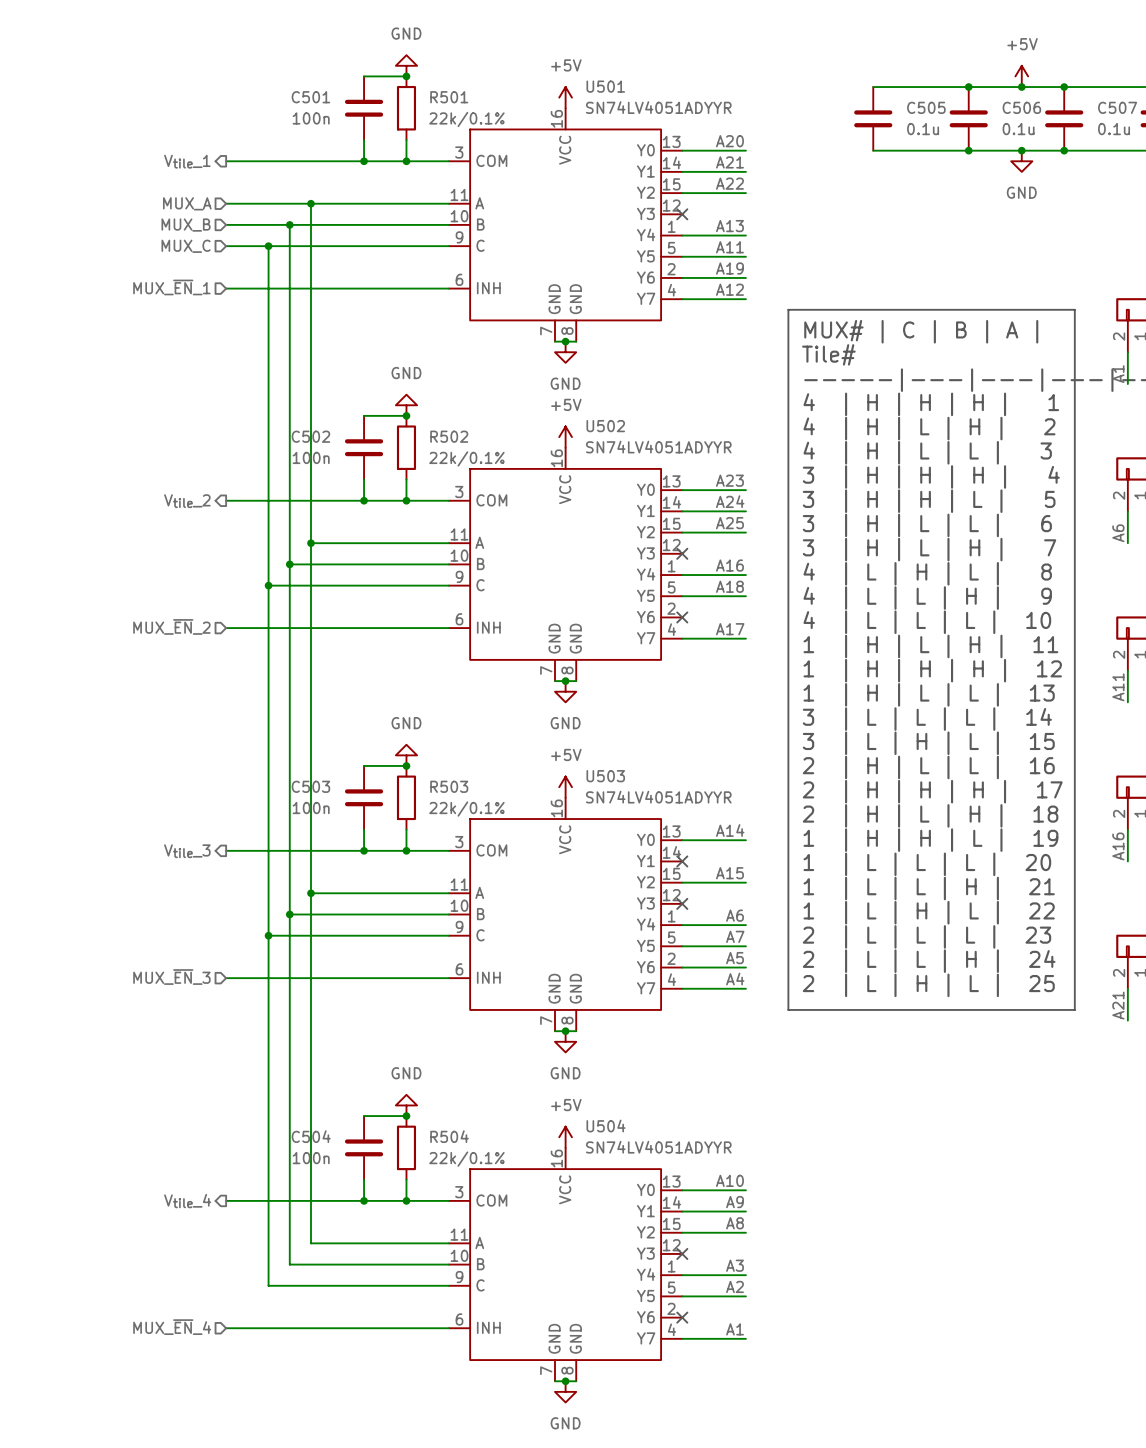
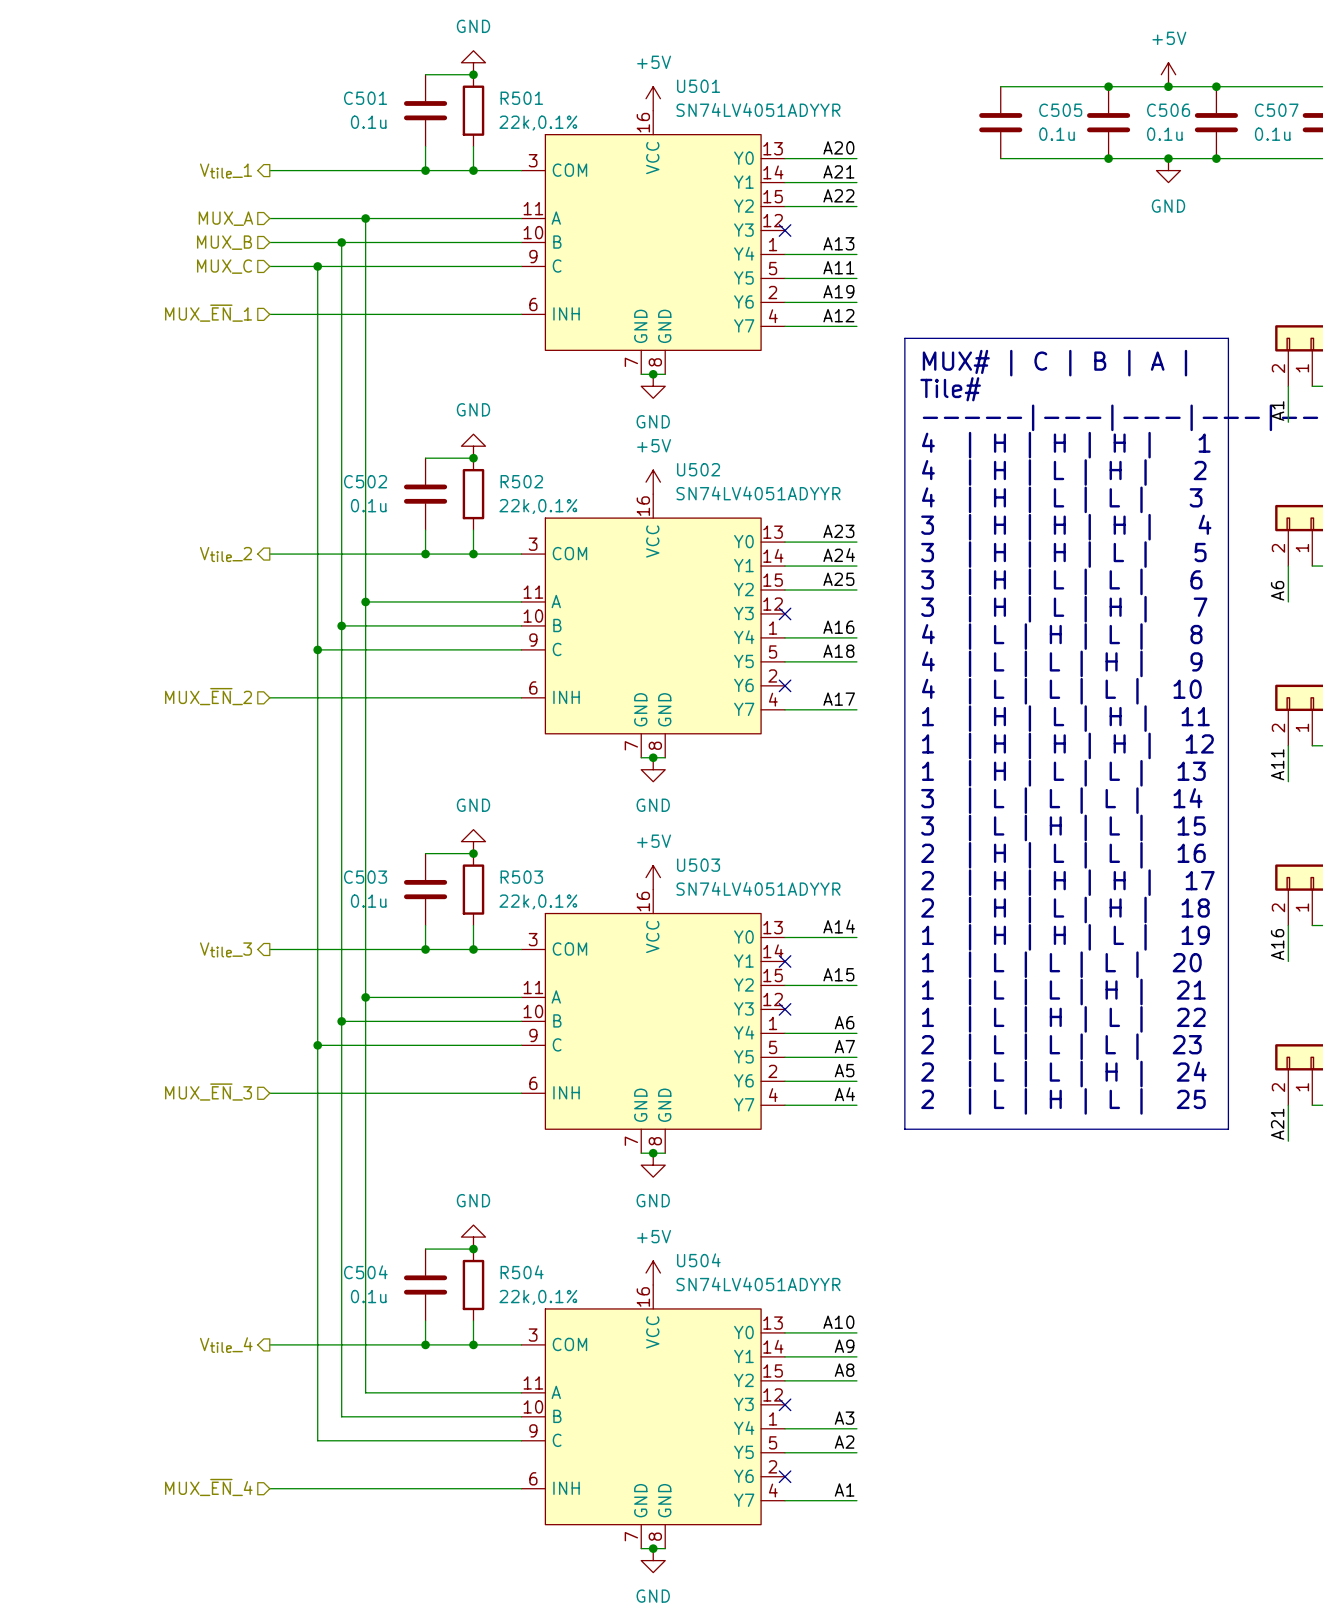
C501 value: 100n (311, 118) -> 0.1u (368, 122)
R501 value: 22k/0.1% (466, 119) -> 22k,0.1% (538, 123)
C502 value: 100n (311, 457) -> 0.1u (368, 505)
R502 value: 22k/0.1% (466, 458) -> 22k,0.1% (538, 506)
C503 value: 100n (311, 808) -> 0.1u (368, 901)
R503 value: 22k/0.1% (466, 809) -> 22k,0.1% (538, 901)
C504 value: 100n (311, 1158) -> 0.1u (368, 1296)
R504 value: 22k/0.1% (466, 1159) -> 22k,0.1% (538, 1297)

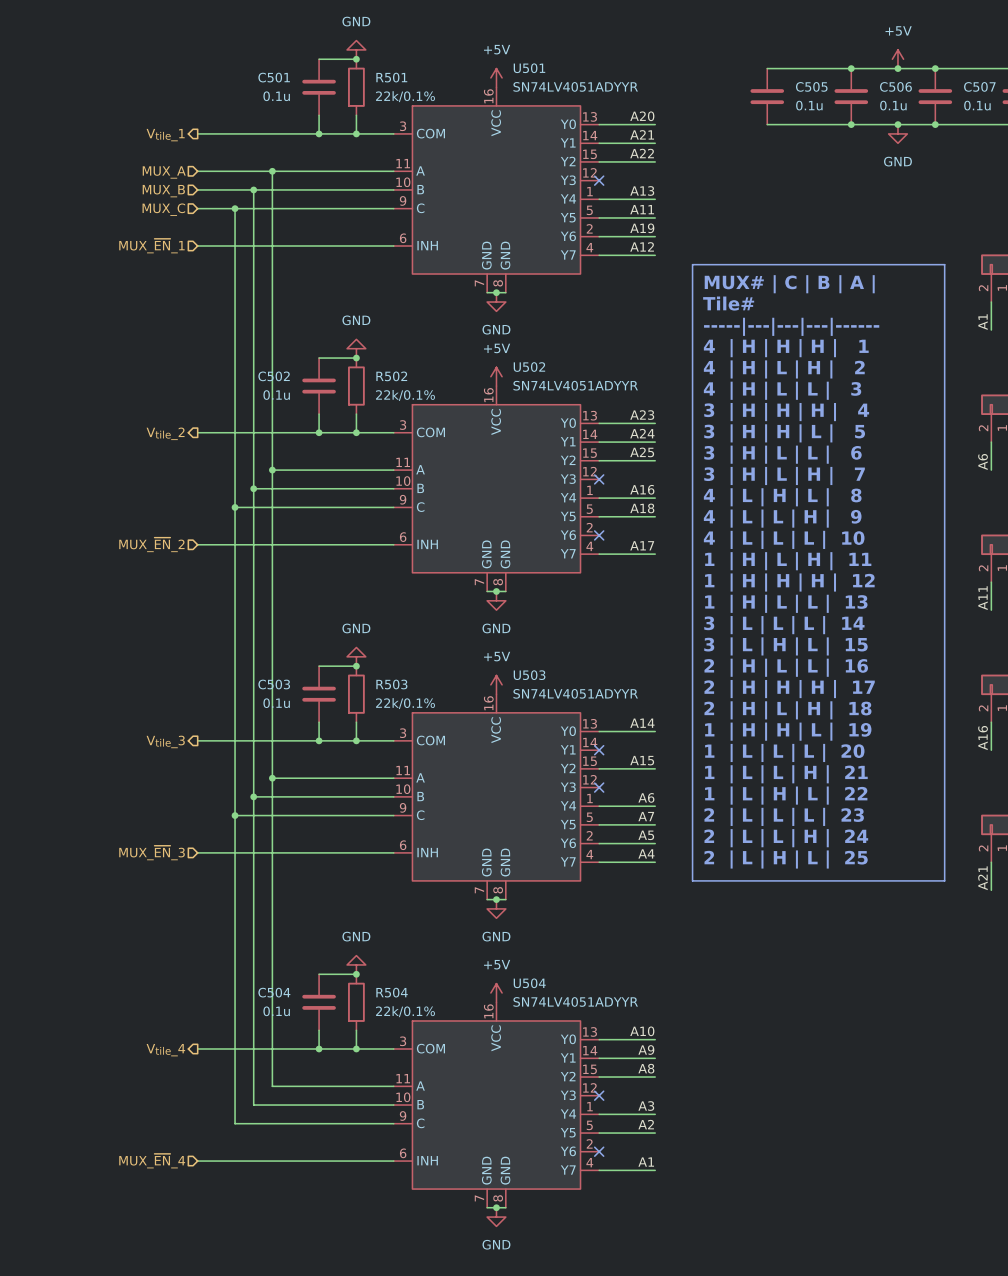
R501 value: 22k,0.1% (538, 123) -> 22k/0.1% (405, 96)
R502 value: 22k,0.1% (538, 506) -> 22k/0.1% (405, 395)
R503 value: 22k,0.1% (538, 901) -> 22k/0.1% (405, 703)
R504 value: 22k,0.1% (538, 1297) -> 22k/0.1% (405, 1011)

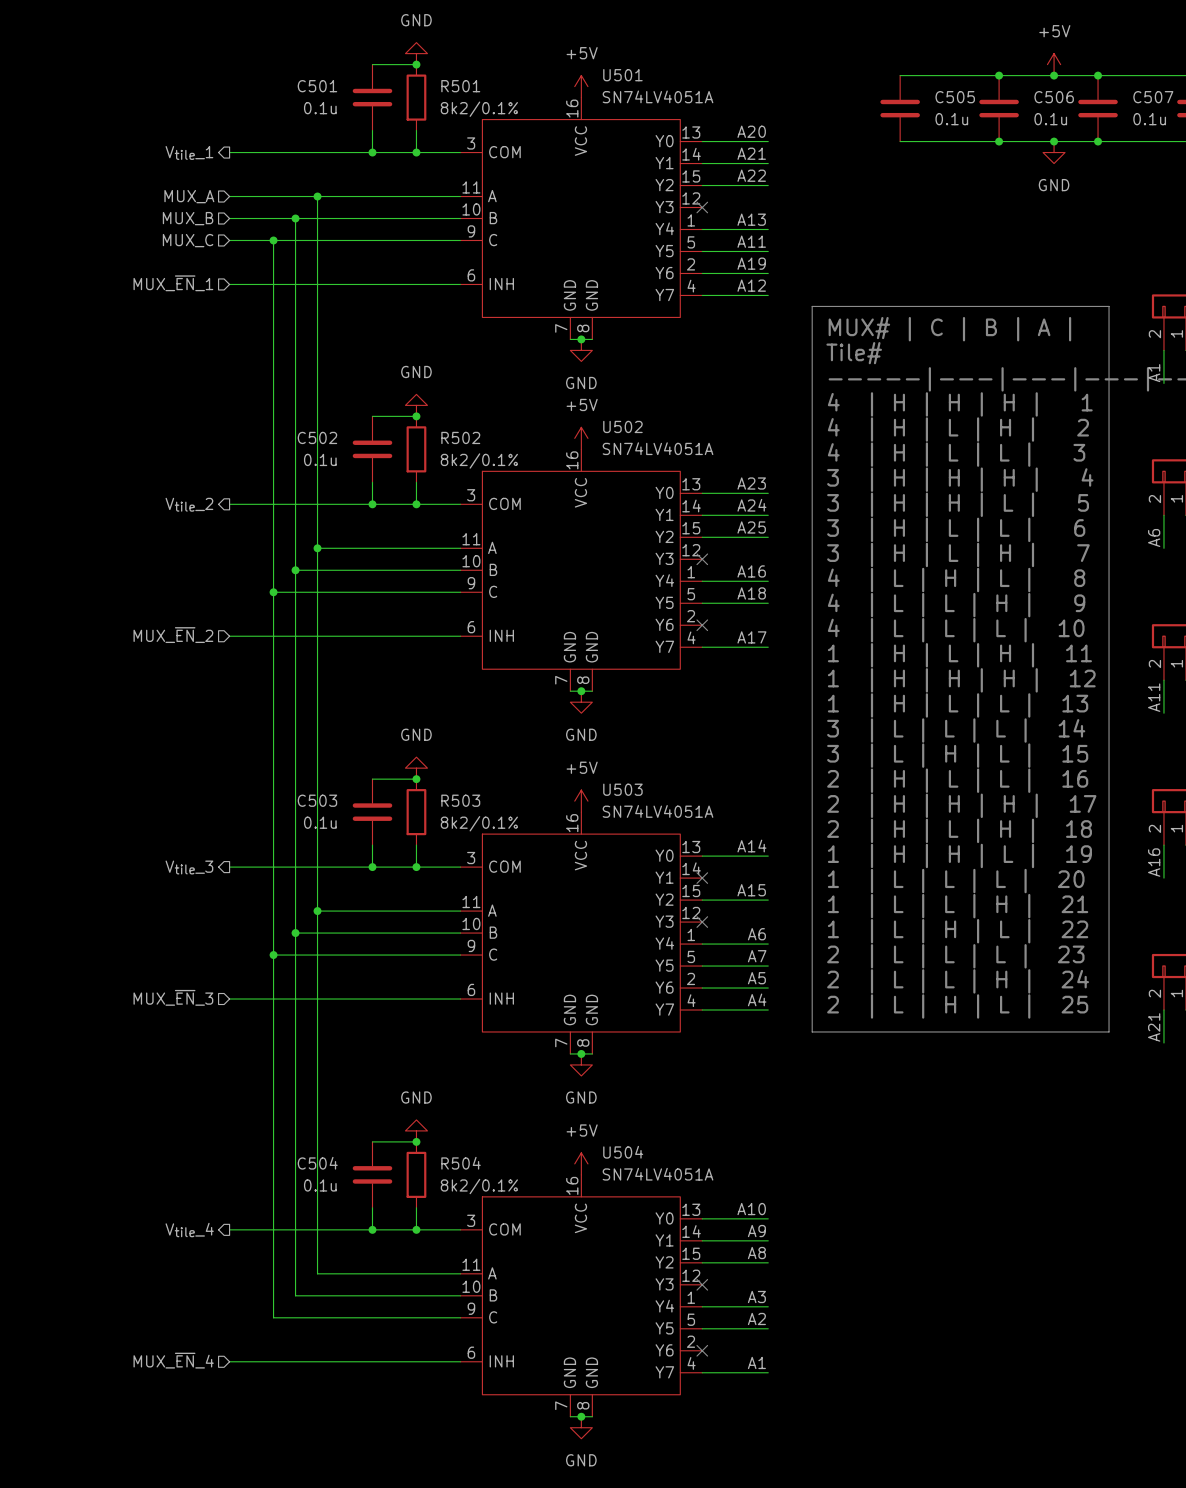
U501 value: SN74LV4051ADYYR (575, 86) -> SN74LV4051A (658, 96)
R501 value: 22k/0.1% (405, 96) -> 8k2/0.1% (479, 109)
U502 value: SN74LV4051ADYYR (575, 385) -> SN74LV4051A (658, 448)
R502 value: 22k/0.1% (405, 395) -> 8k2/0.1% (479, 460)
U503 value: SN74LV4051ADYYR (575, 693) -> SN74LV4051A (658, 811)
R503 value: 22k/0.1% (405, 703) -> 8k2/0.1% (479, 823)
U504 value: SN74LV4051ADYYR (575, 1001) -> SN74LV4051A (658, 1174)
R504 value: 22k/0.1% (405, 1011) -> 8k2/0.1% (479, 1186)

